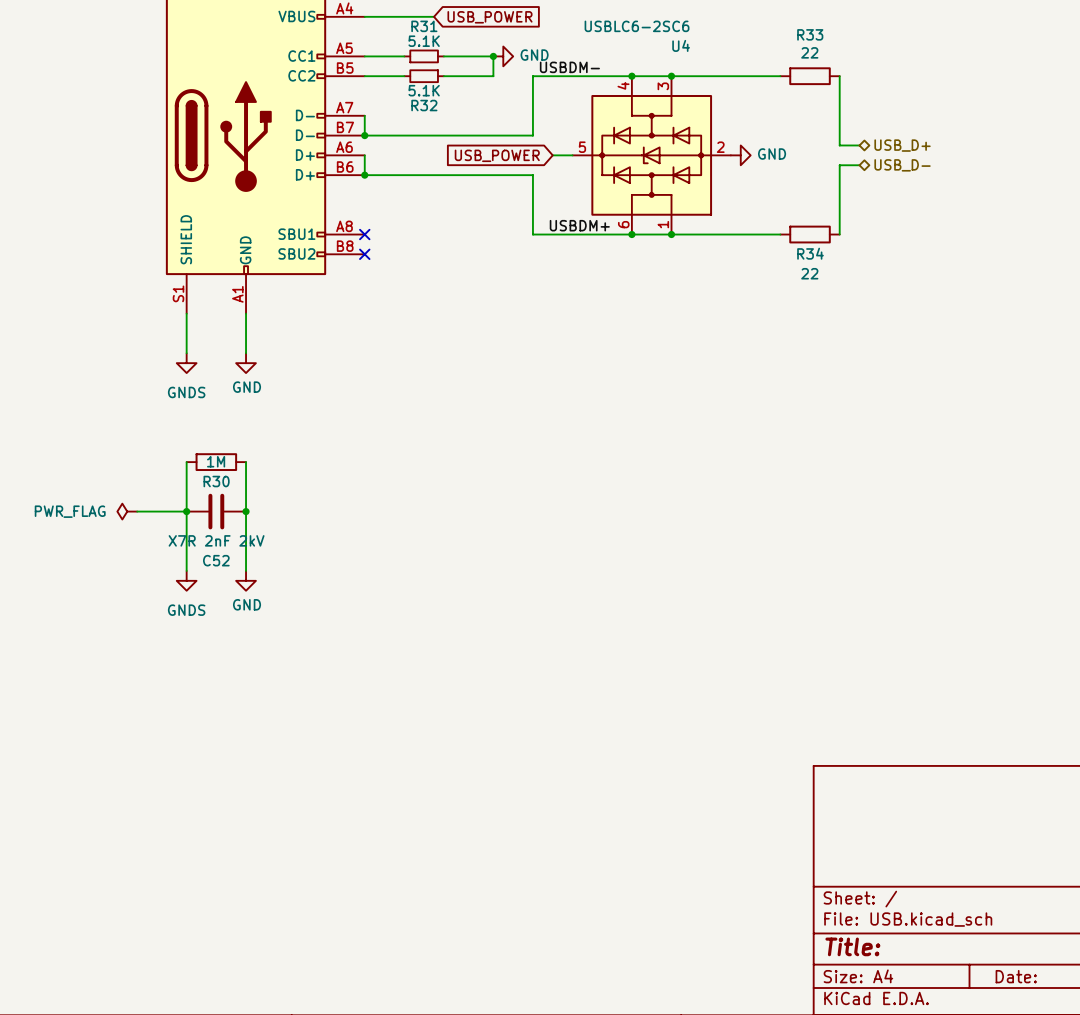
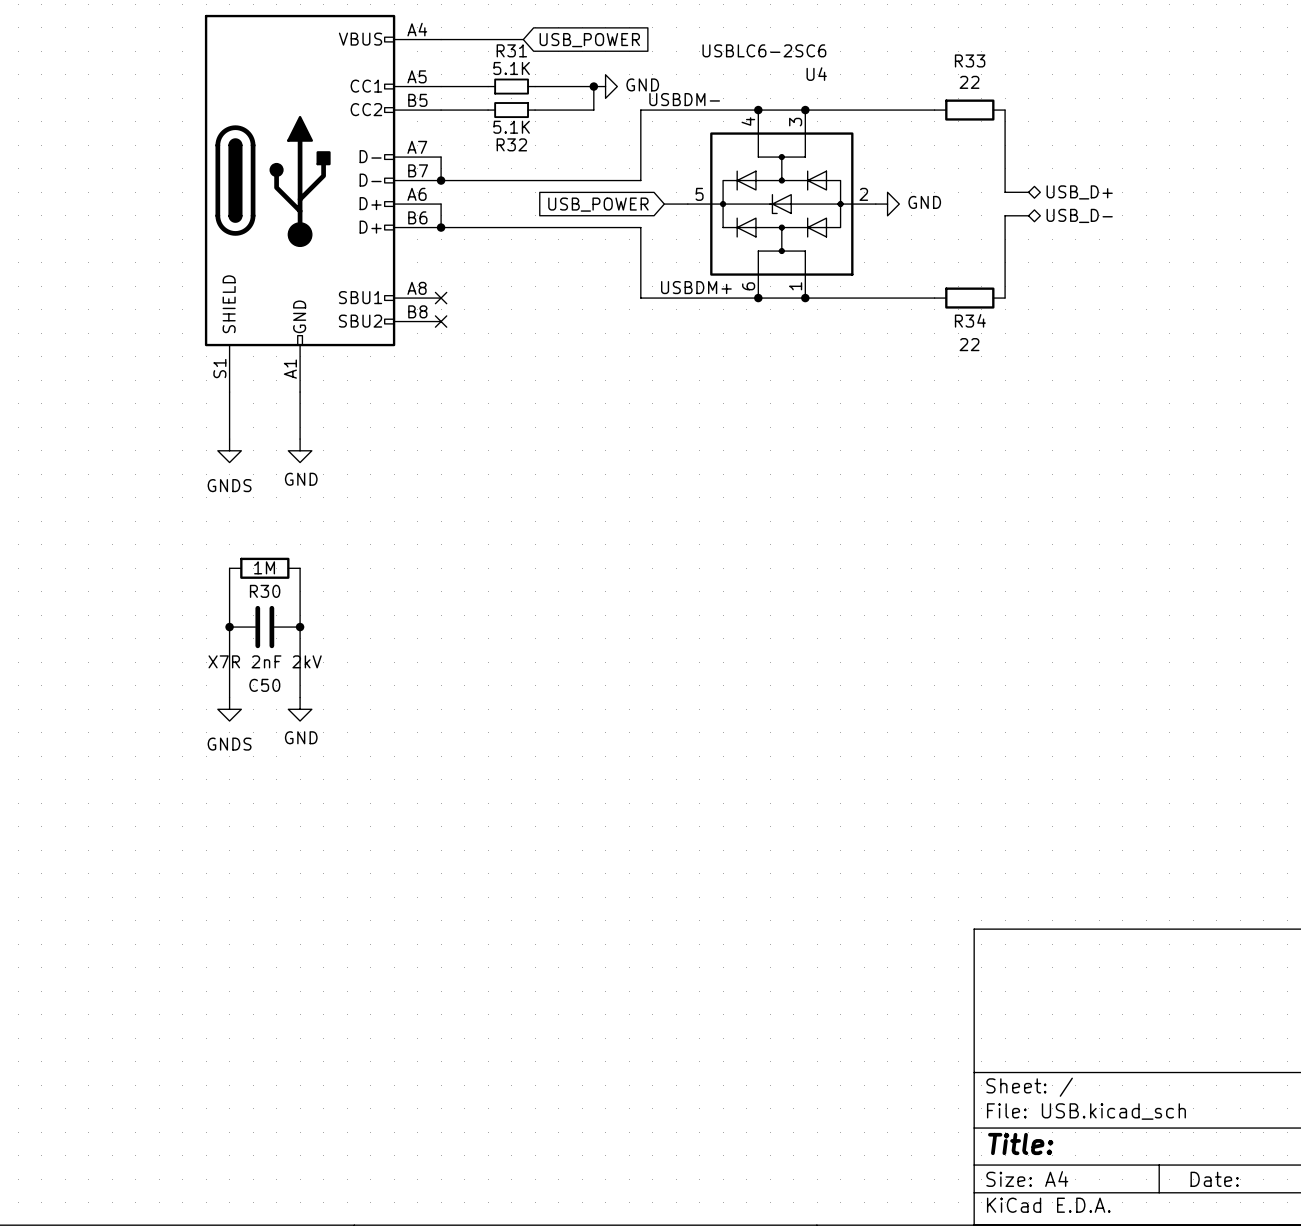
power symbol: PWR_FLAG (127, 511) -> none
wire: (137, 511) (186, 511) -> none
C52 name: C52 (216, 560) -> C50 (264, 685)

